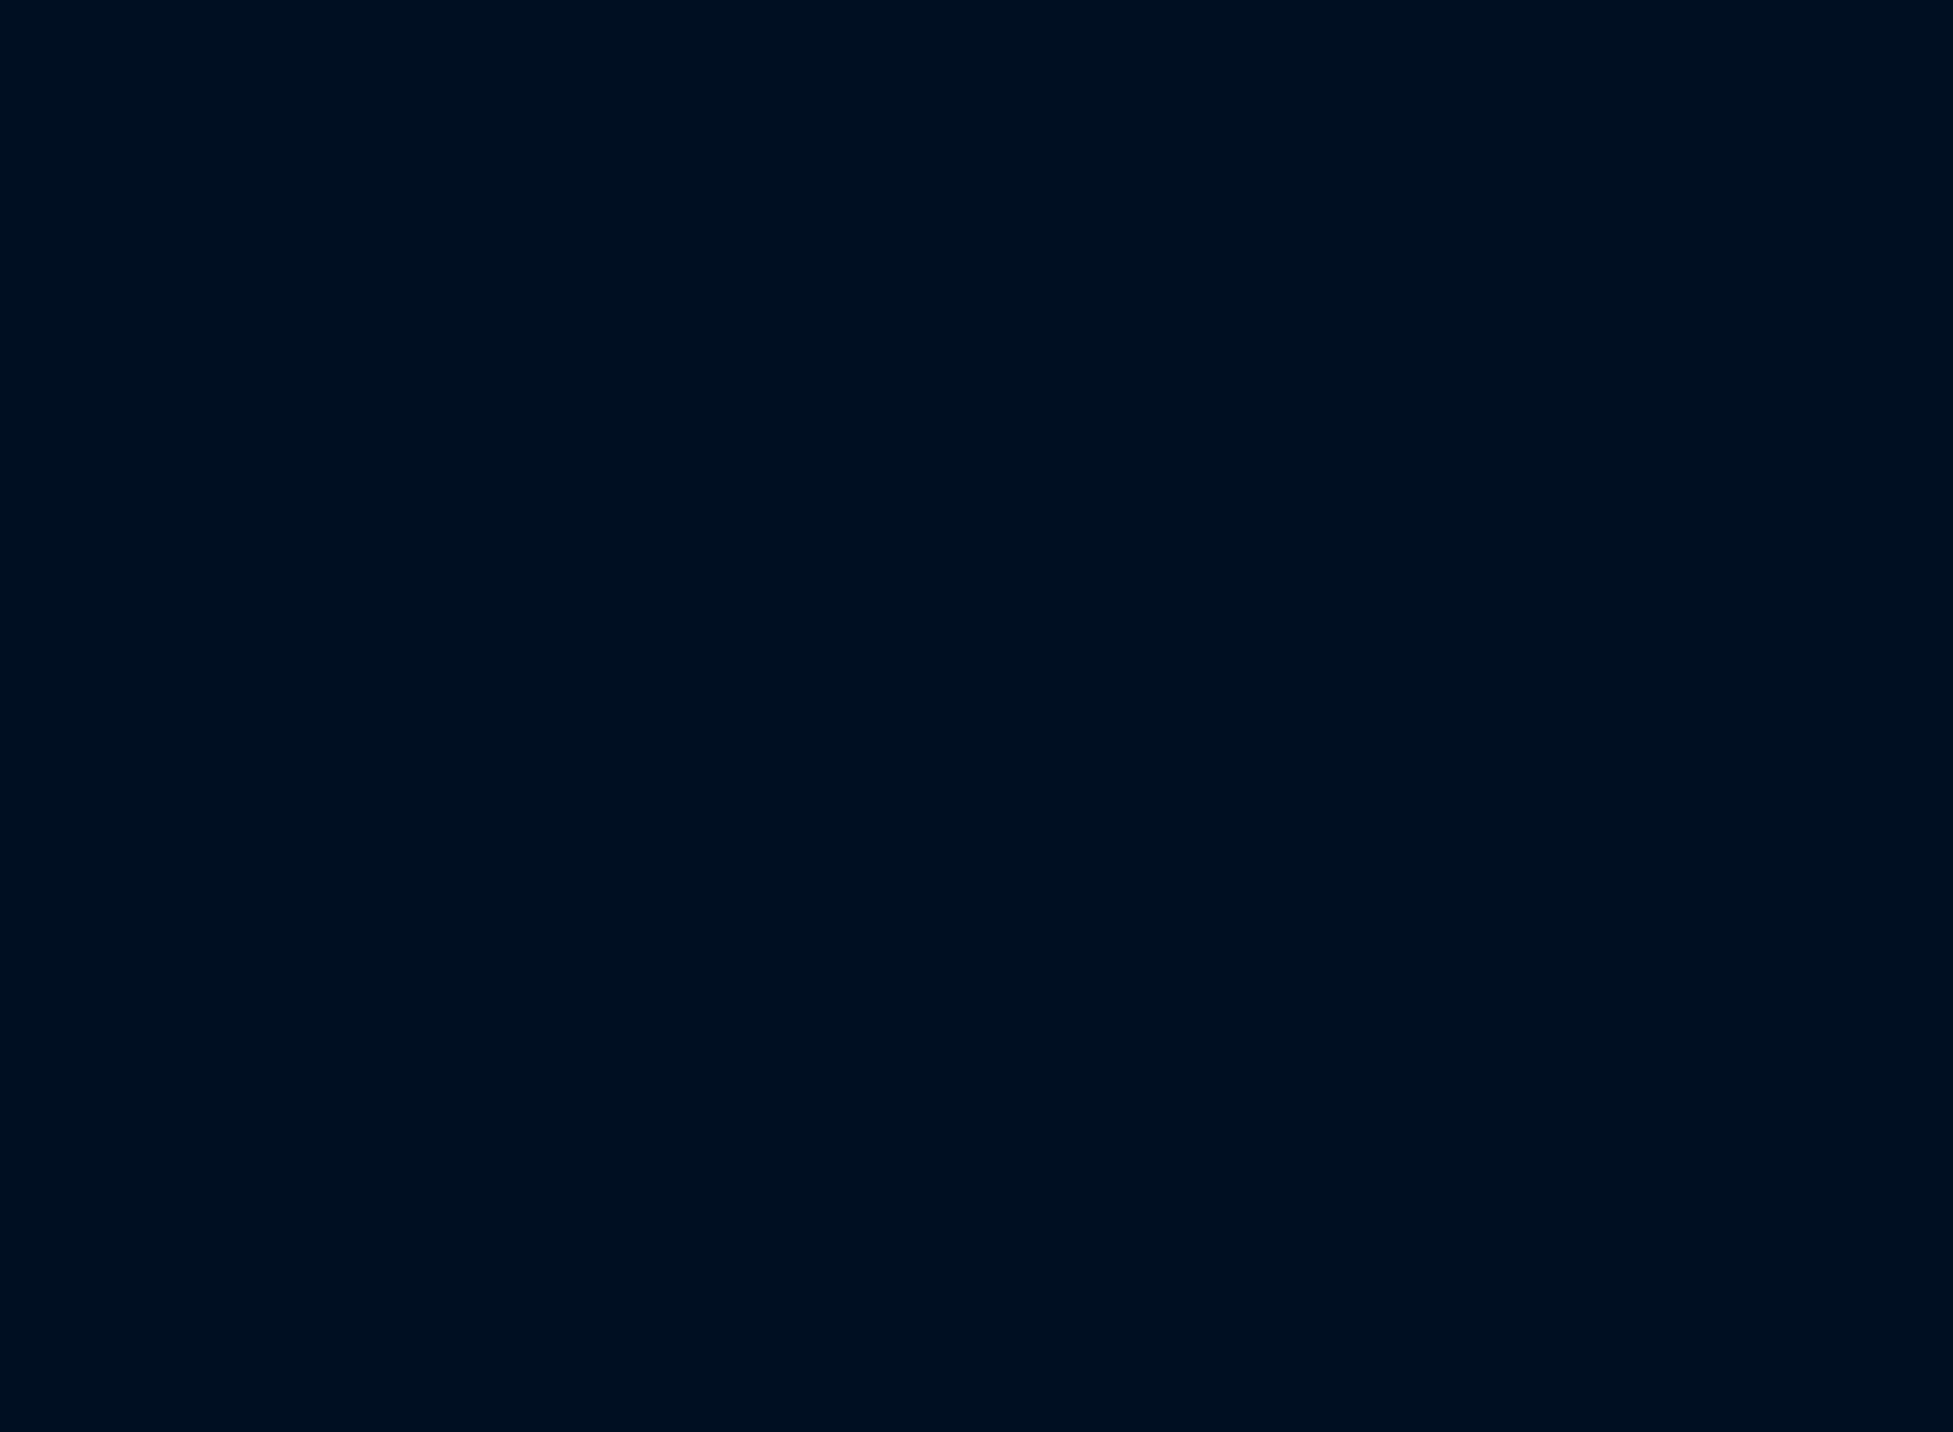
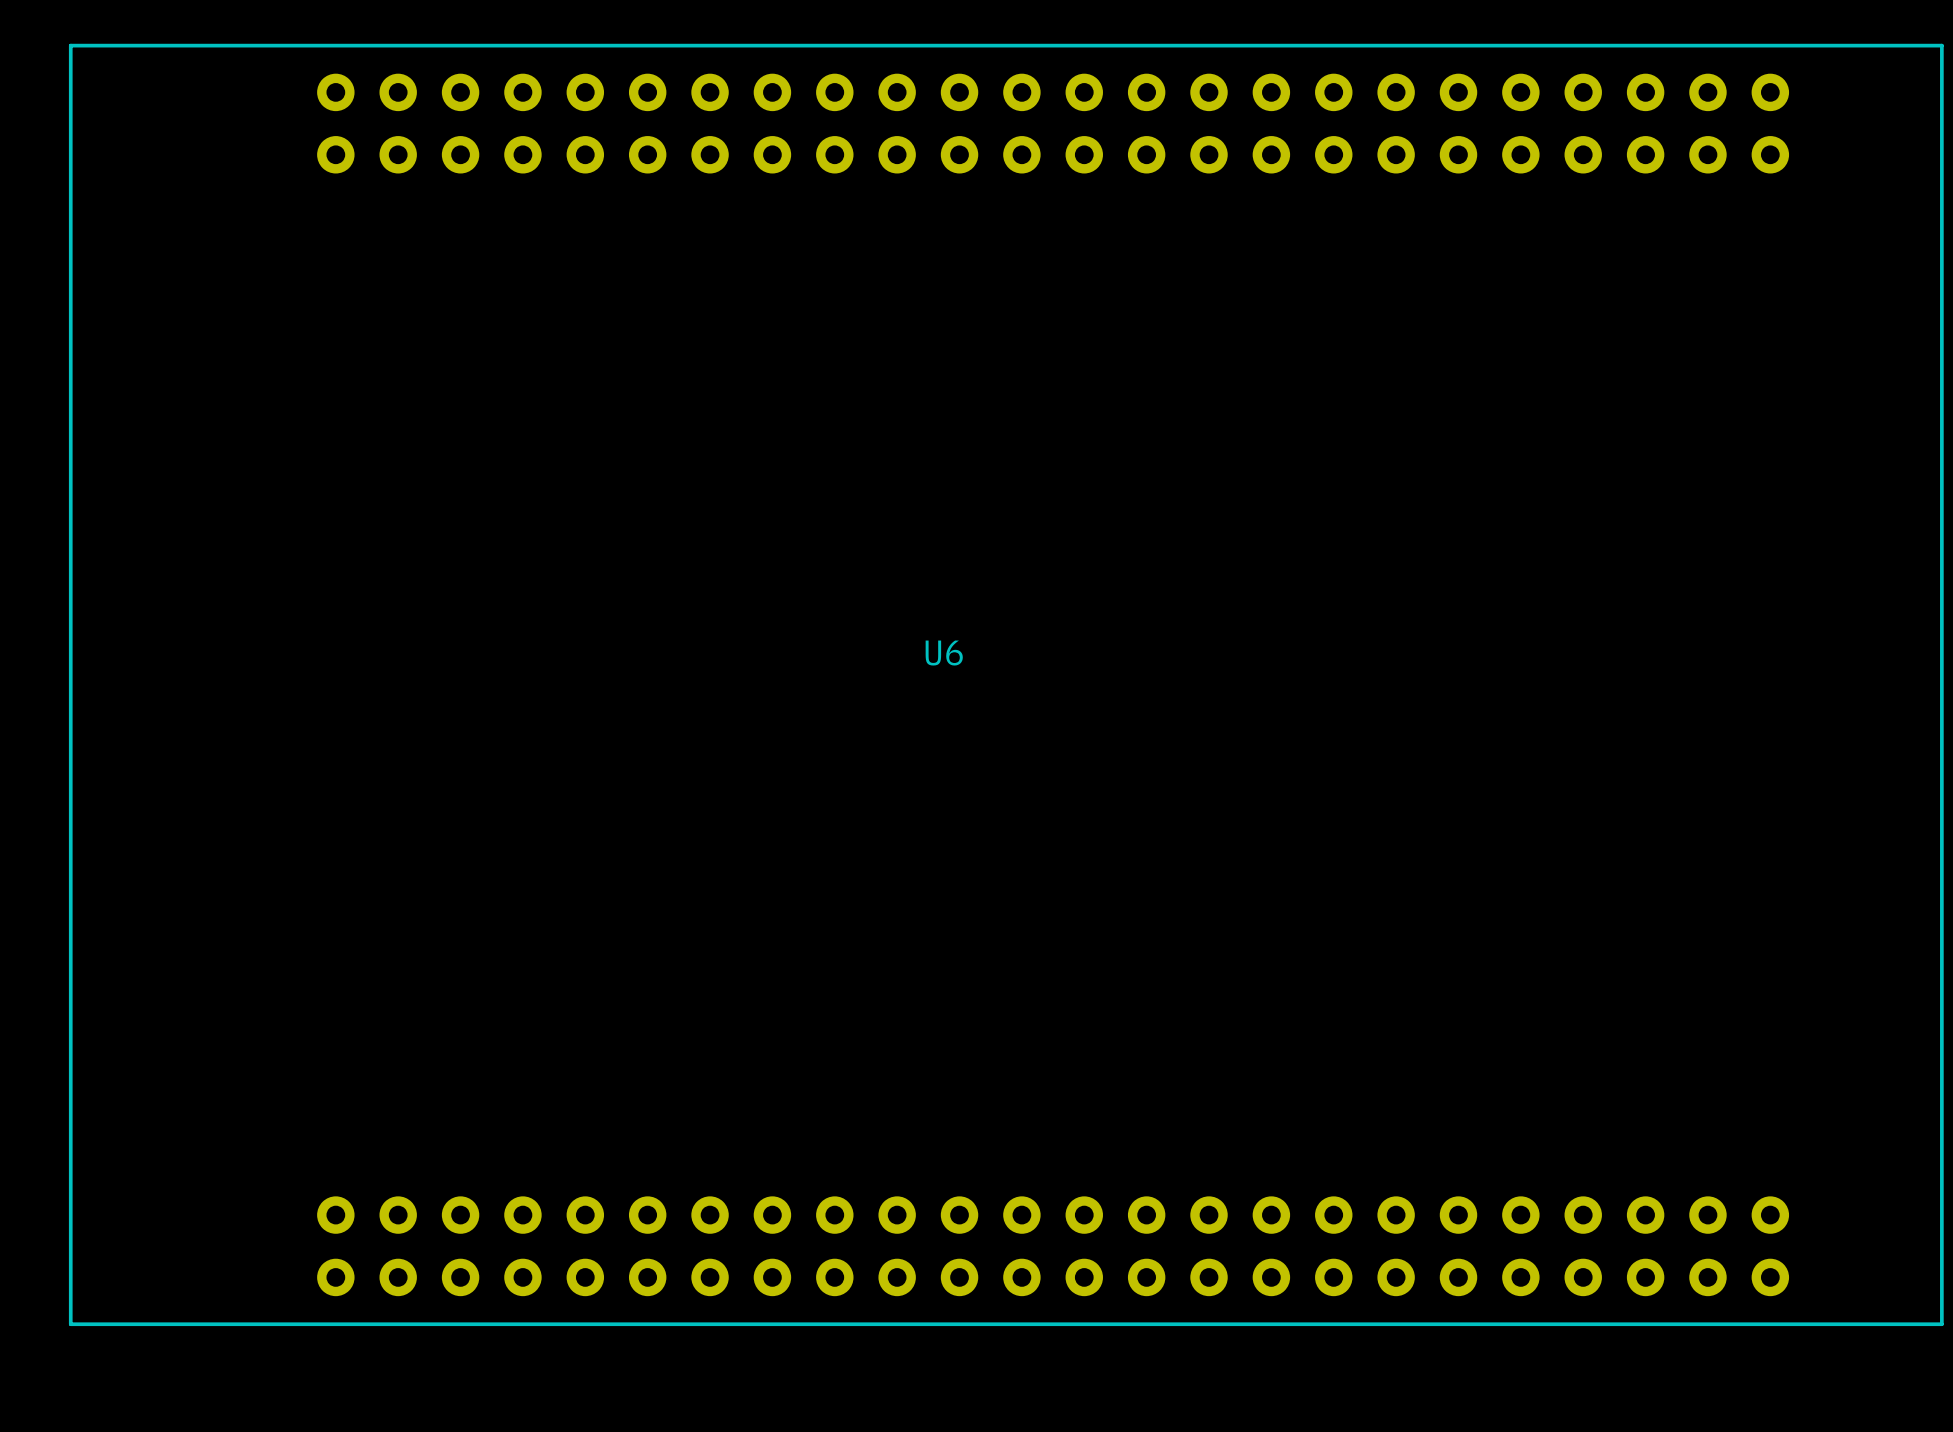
U6: none -> (1006, 684)

